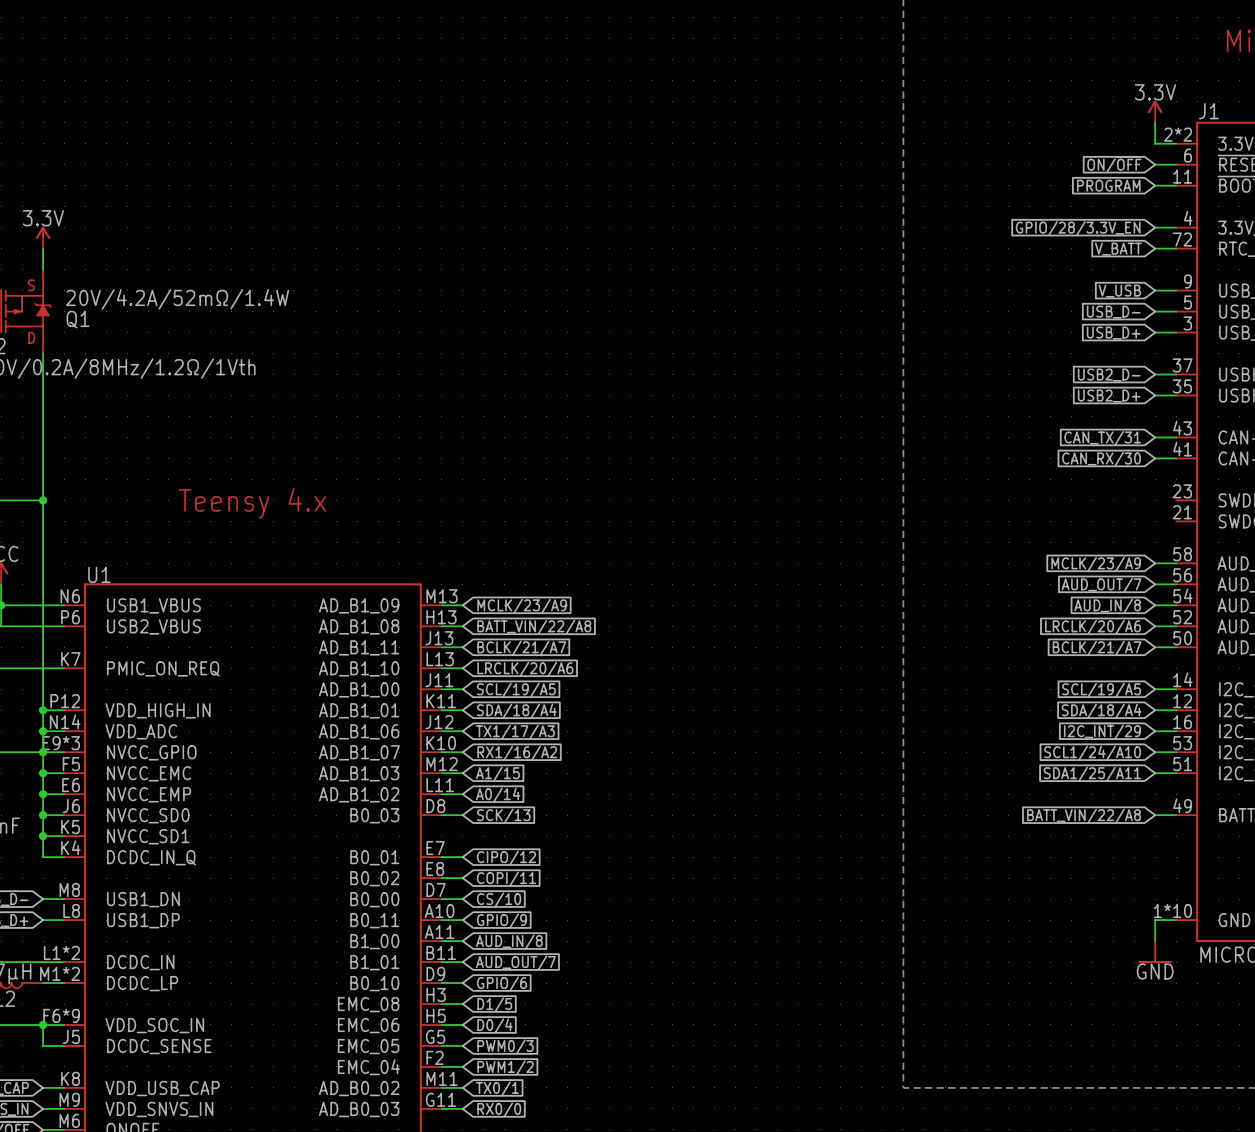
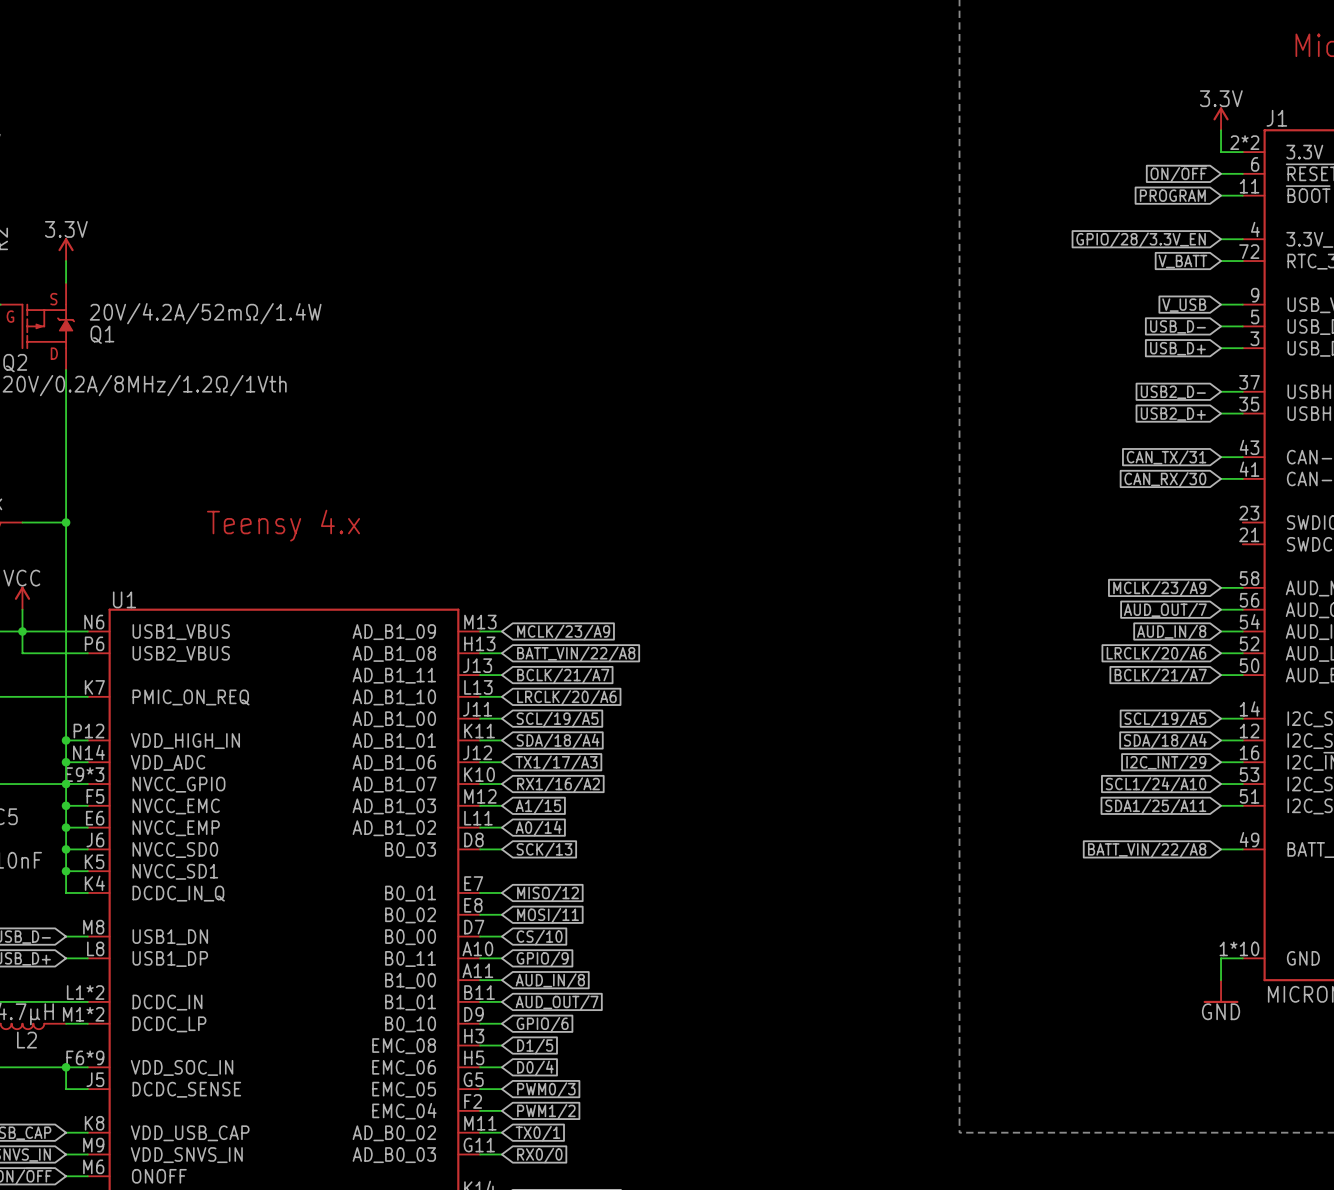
global label: CIPO/12 (506, 858) -> MISO/12 (548, 894)
global label: COPI/11 (506, 879) -> MOSI/11 (548, 915)

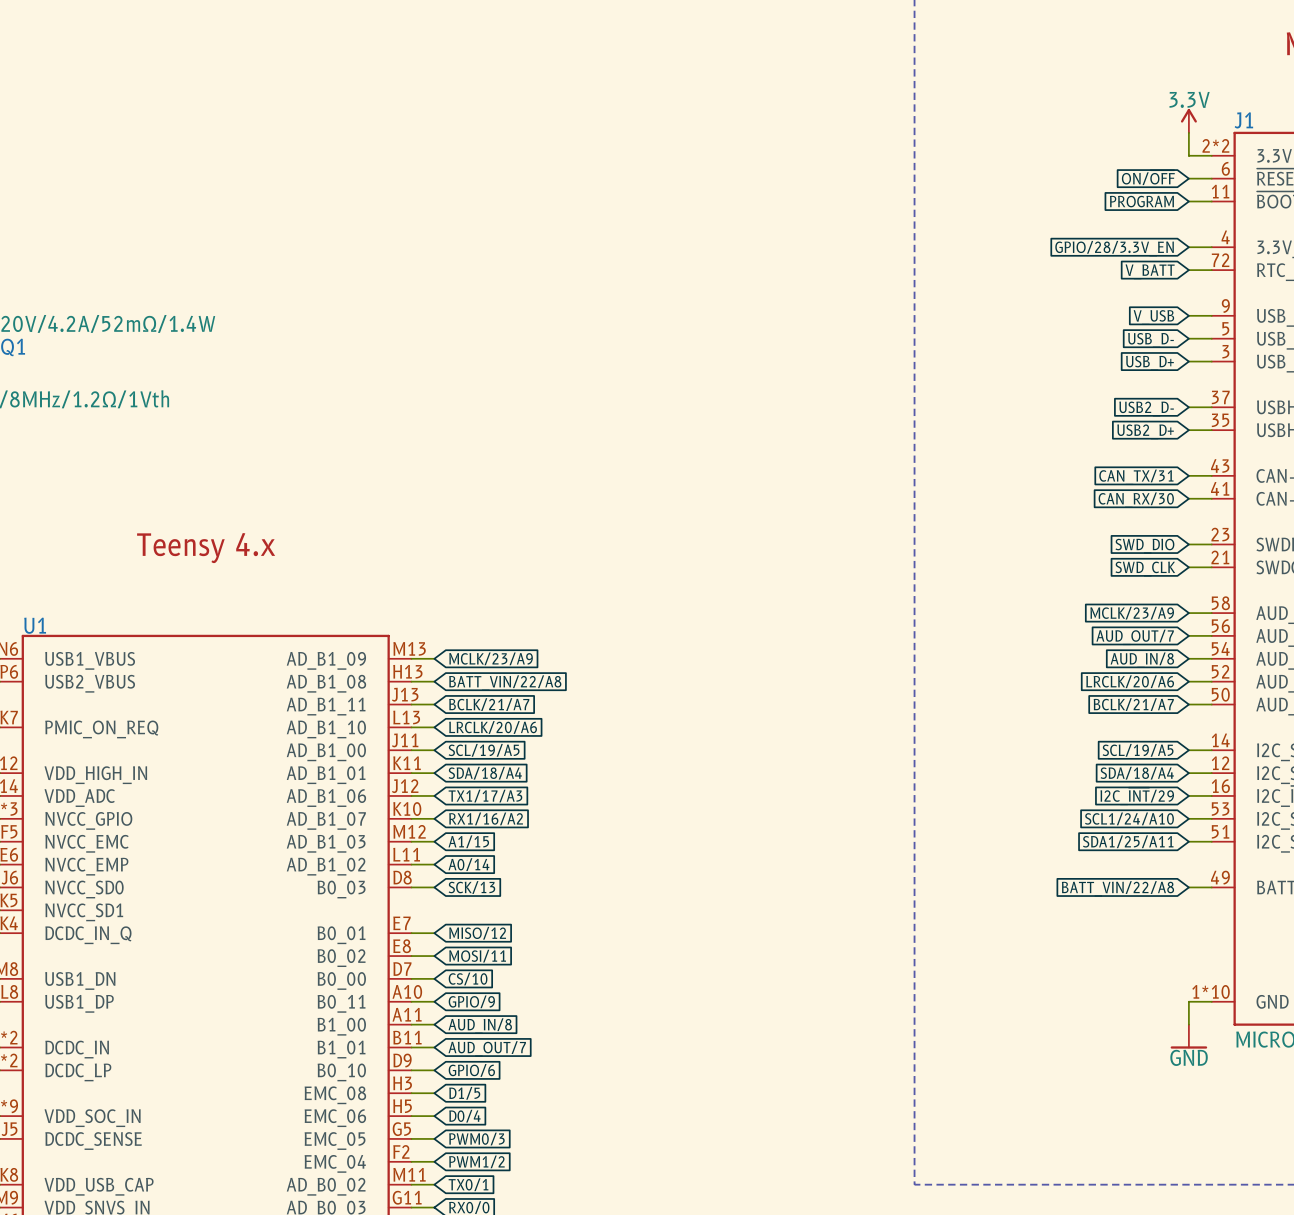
wire: none -> (1188, 544) (1211, 544)
global label: none -> SWD_DIO (1144, 546)
global label: none -> SWD_CLK (1145, 569)
wire: none -> (1188, 567) (1211, 567)

